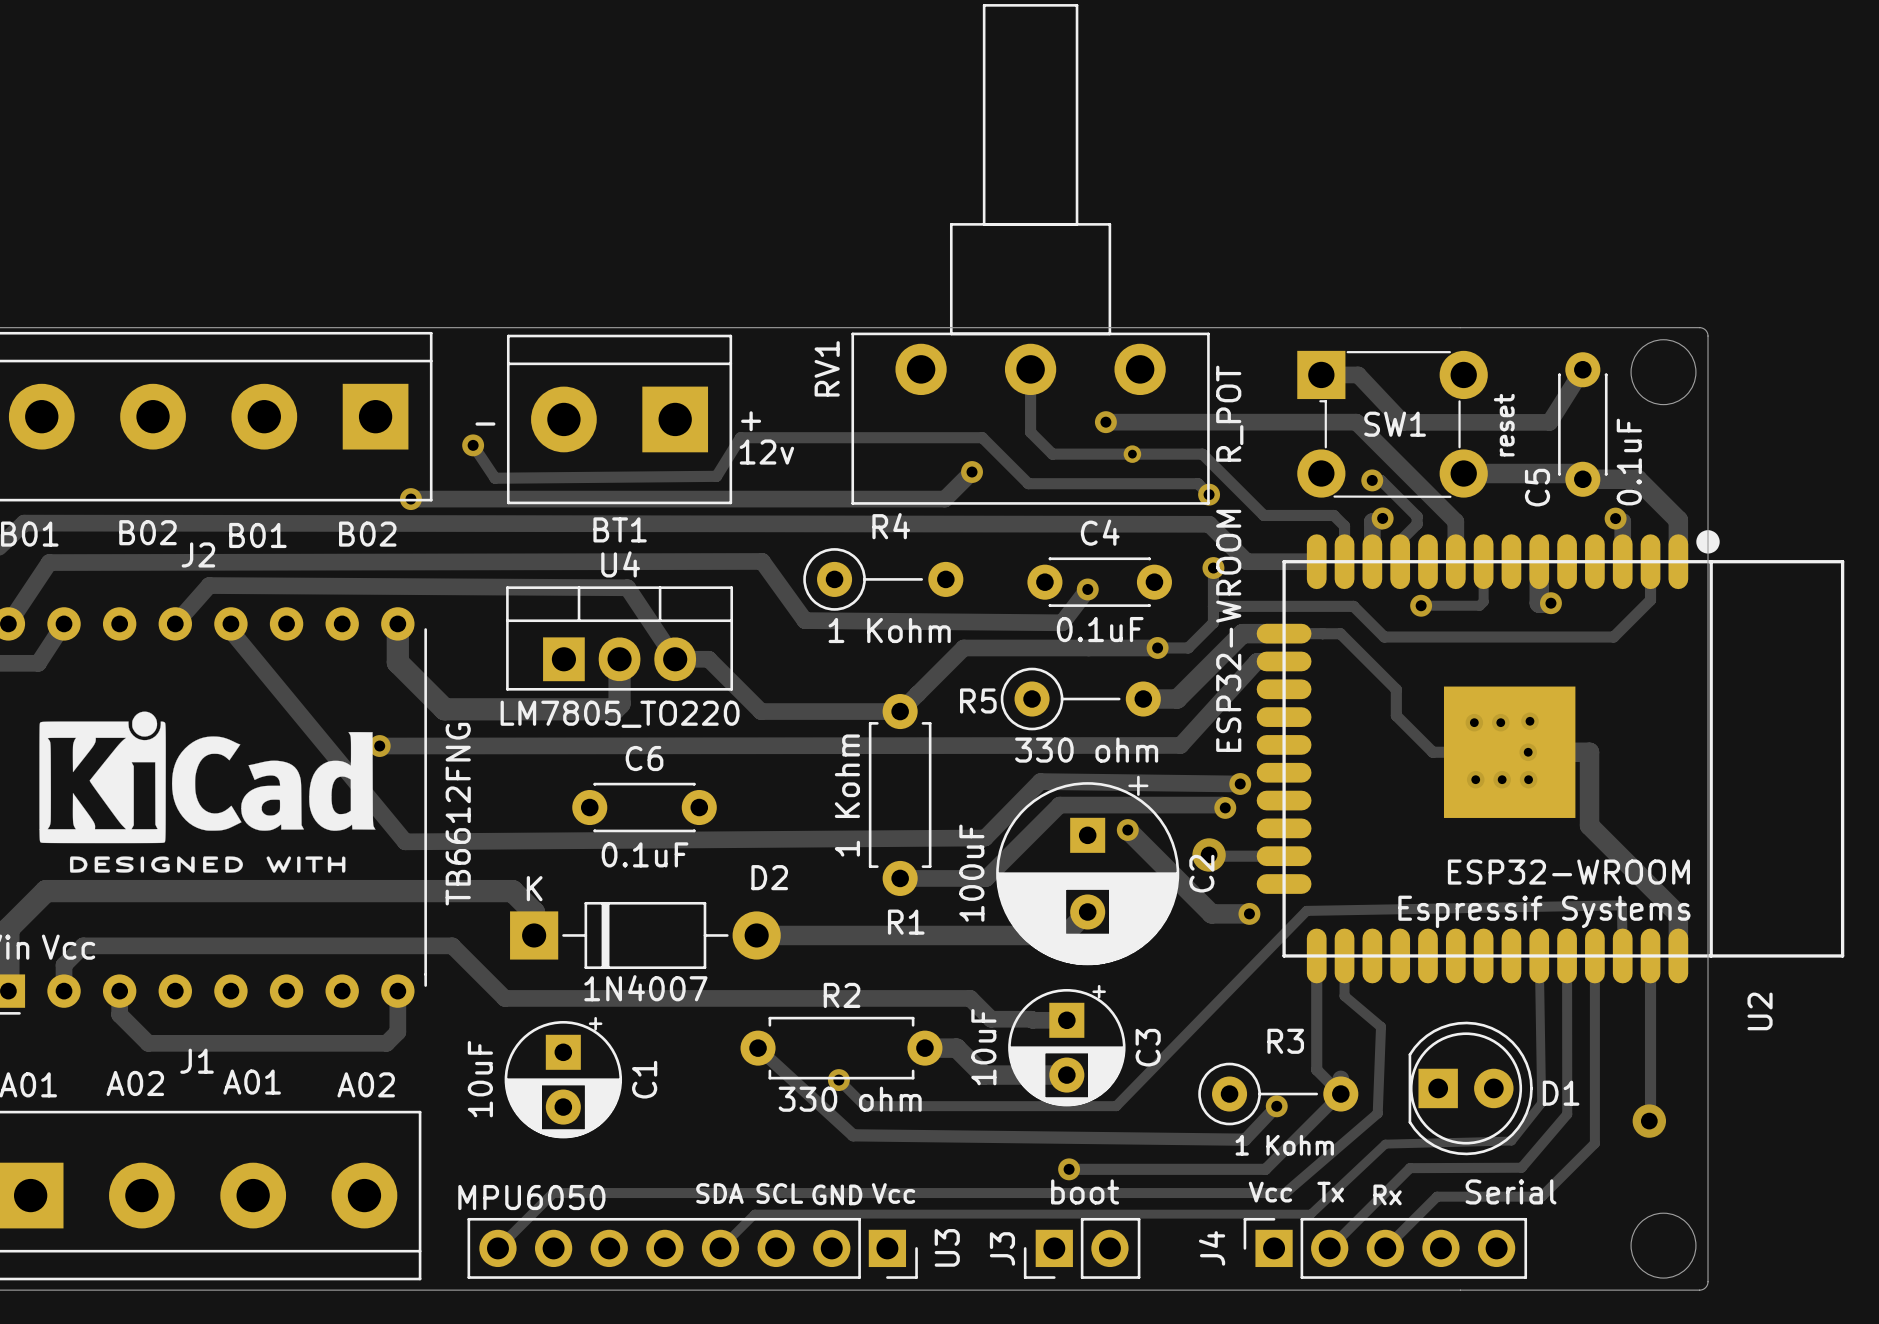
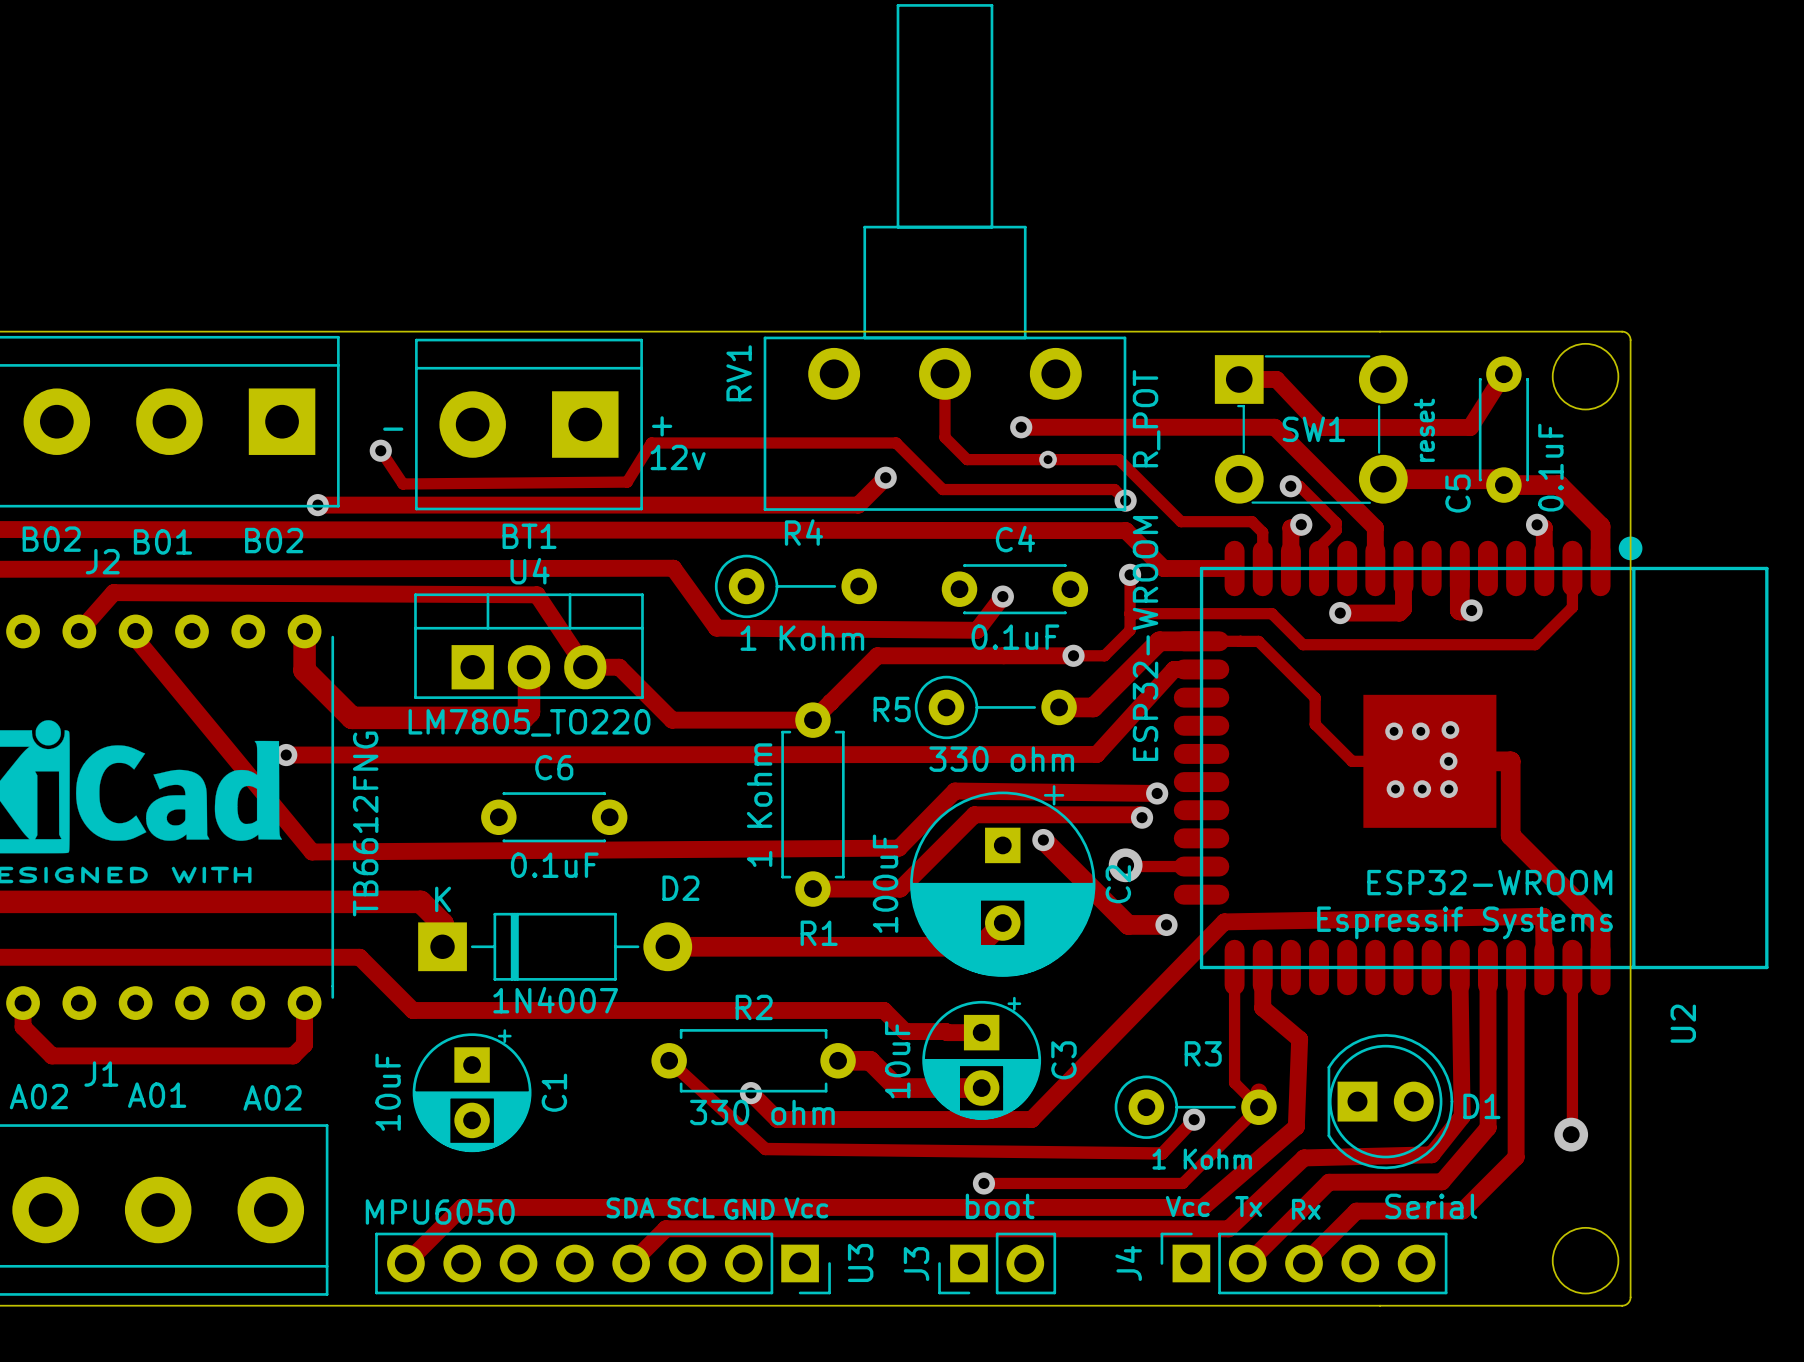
track width: thin (1483, 561) (1483, 601) (1479, 605) (1421, 605) -> thick (1403, 568) (1403, 609) (1399, 613) (1340, 613)
track width: thin (1344, 955) (1344, 996) (1381, 1026) (1377, 1113) (1285, 1193) (553, 1193) (497, 1248) -> thick (1262, 967) (1262, 1008) (1299, 1039) (1296, 1126) (1202, 1207) (461, 1207) (405, 1263)
track width: thin (1539, 955) (1541, 1103) (1511, 1141) (1385, 1144) (1310, 1214) (754, 1214) (720, 1248) -> thick (1459, 967) (1462, 1116) (1431, 1154) (1304, 1157) (1228, 1228) (665, 1228) (631, 1263)
track width: thin (1567, 955) (1567, 1114) (1521, 1167) (1409, 1168) (1329, 1248) -> thick (1487, 967) (1488, 1127) (1441, 1181) (1328, 1182) (1247, 1263)
track width: thin (1594, 955) (1594, 1143) (1541, 1196) (1437, 1196) (1385, 1248) -> thick (1516, 967) (1516, 1157) (1462, 1211) (1356, 1211) (1304, 1263)
track width: thin (1622, 955) (1621, 905) (1306, 910) (1116, 1106) (864, 1106) (838, 1080) -> thick (1544, 967) (1543, 916) (1224, 921) (1031, 1119) (777, 1119) (750, 1093)

